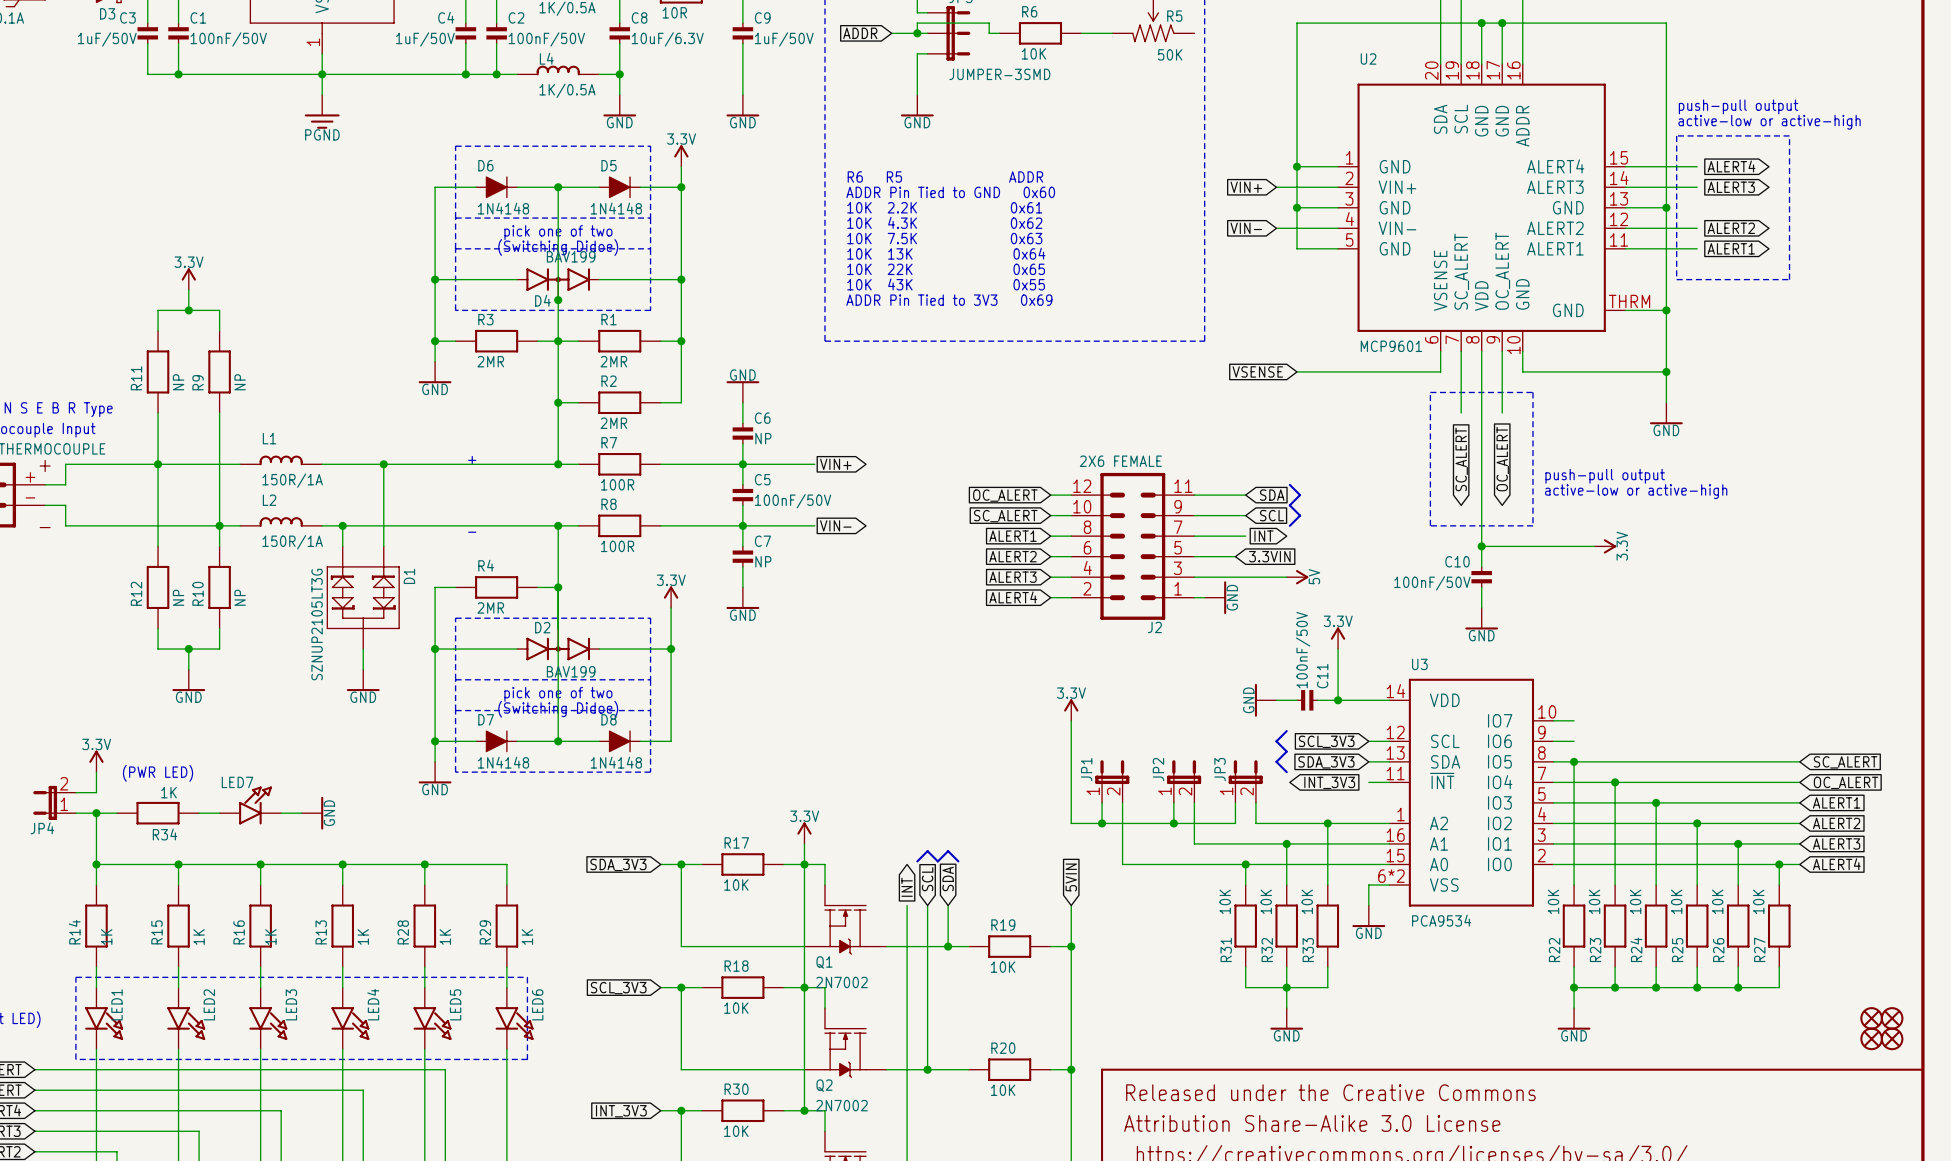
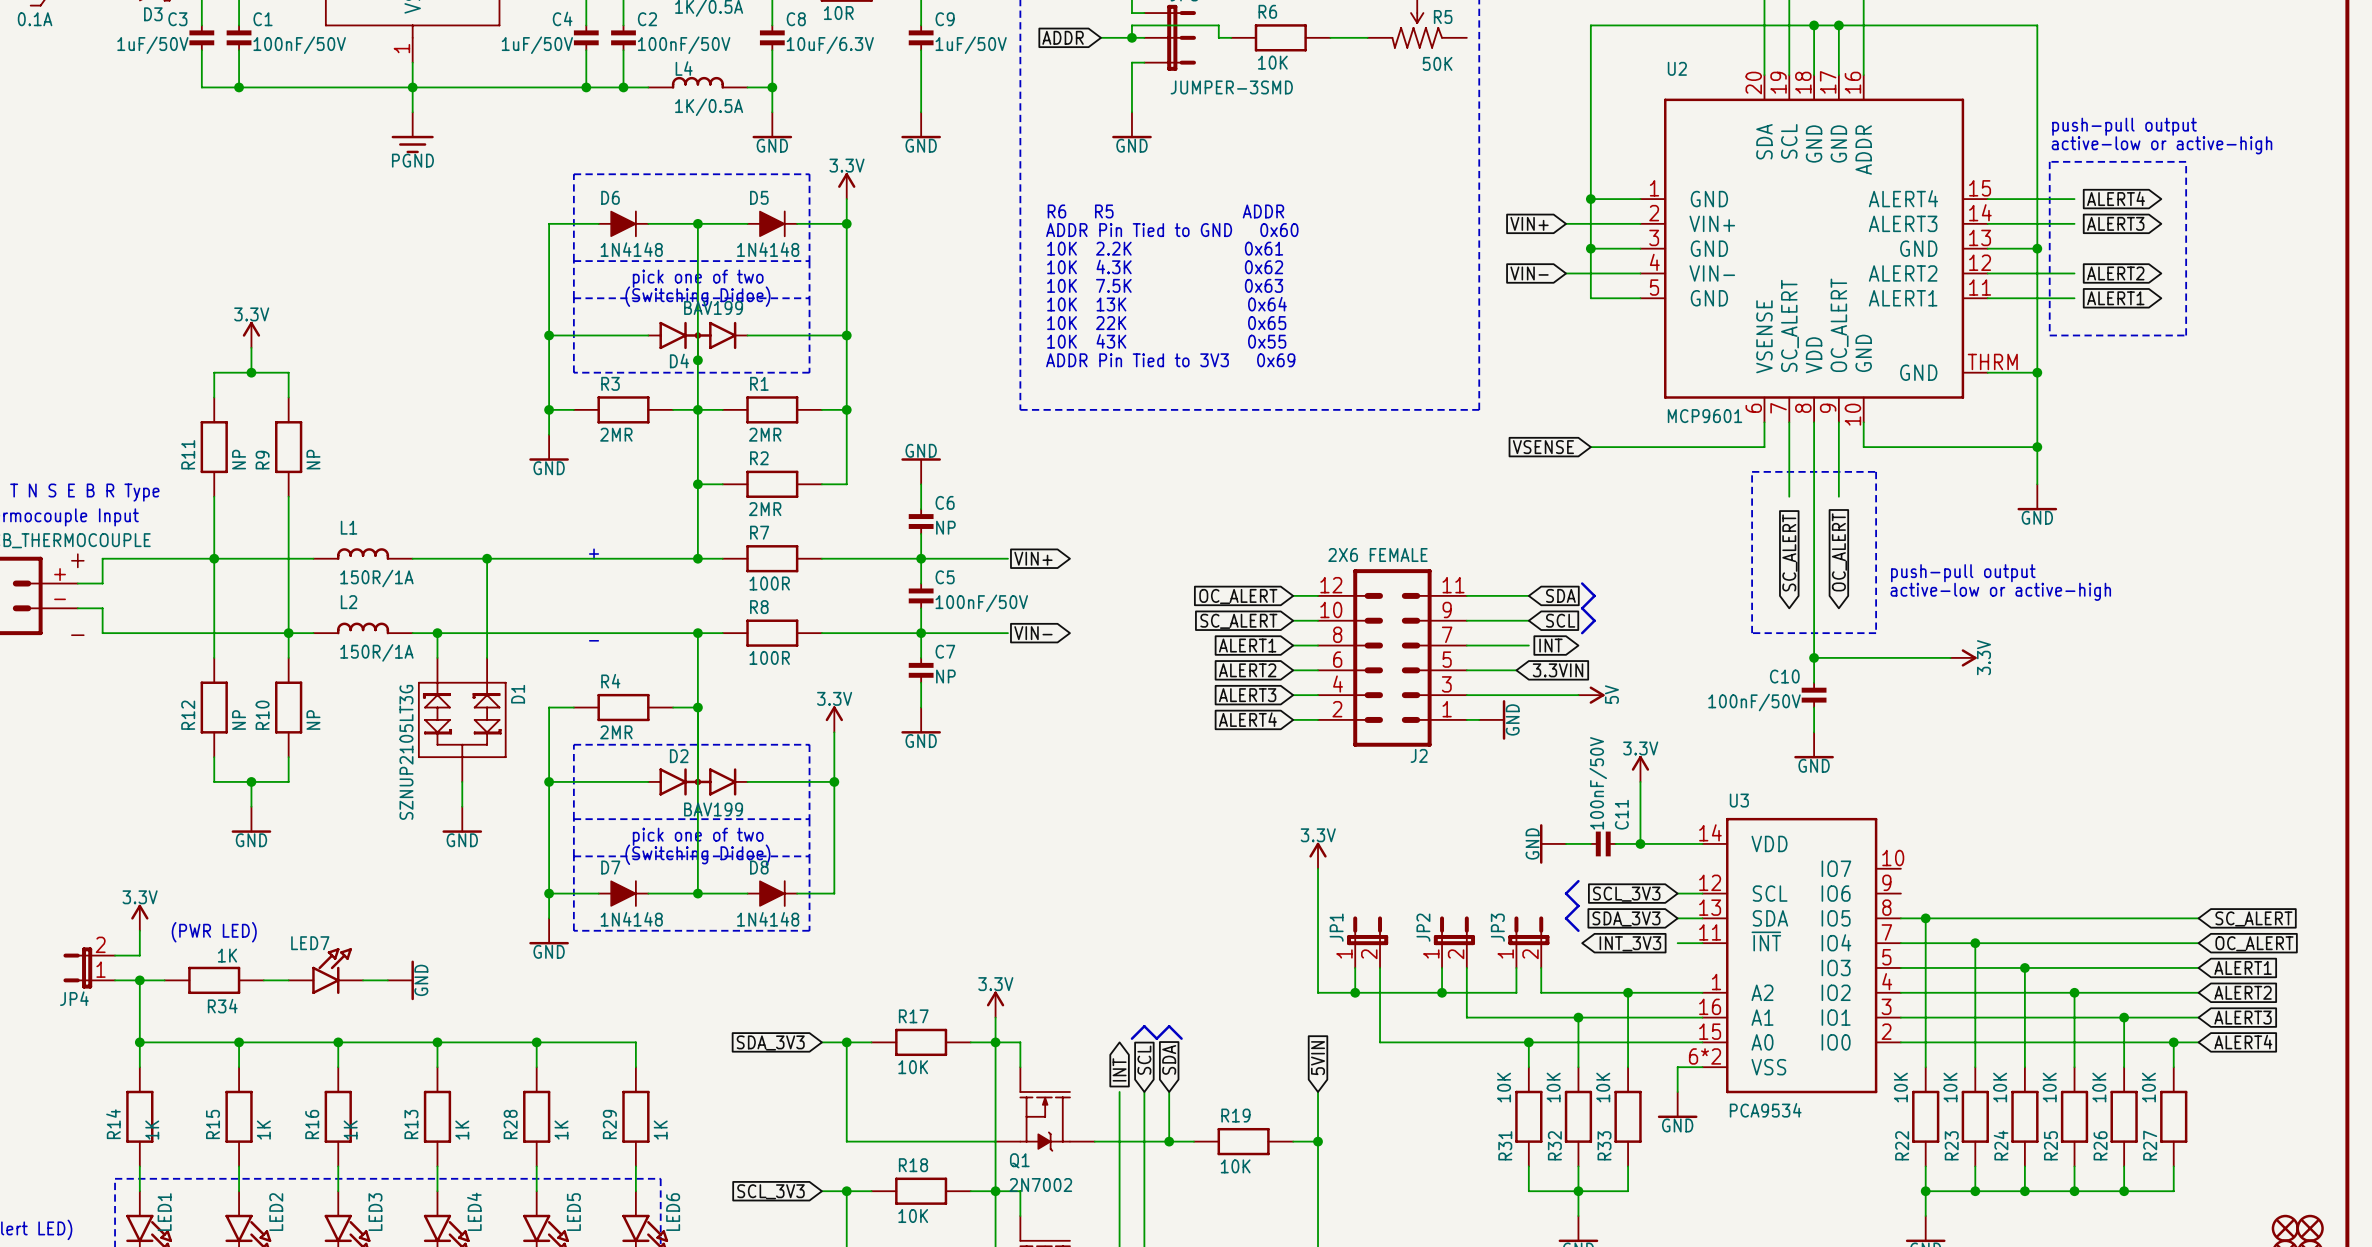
wire: (1553, 720) (1574, 720) -> none
wire: (1553, 741) (1574, 741) -> none

